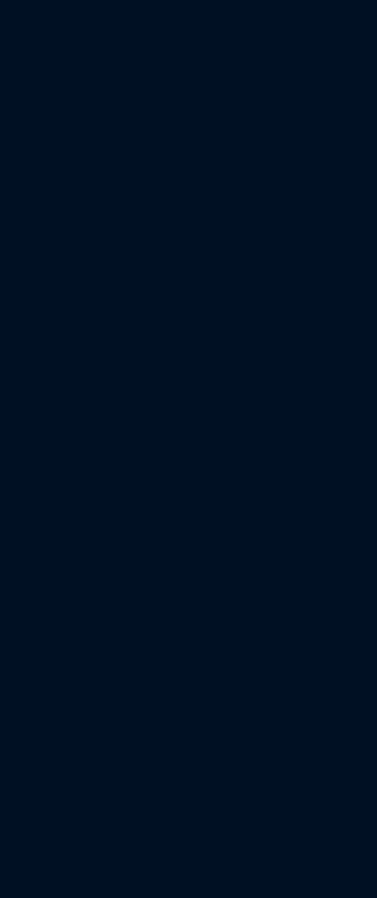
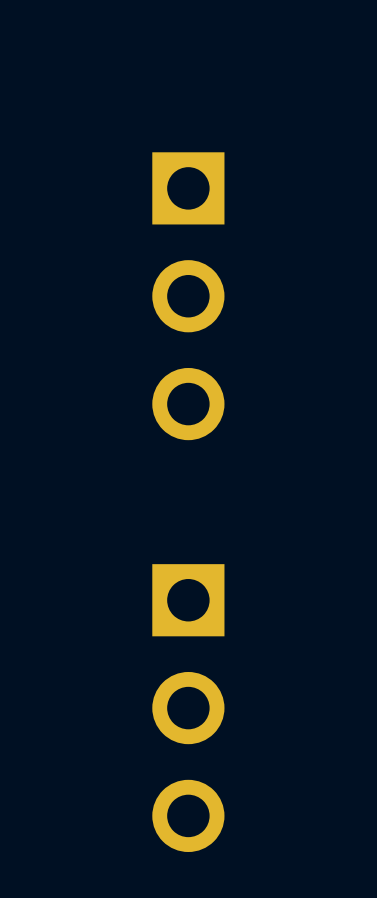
part: none -> (188, 296)
part: none -> (188, 708)

